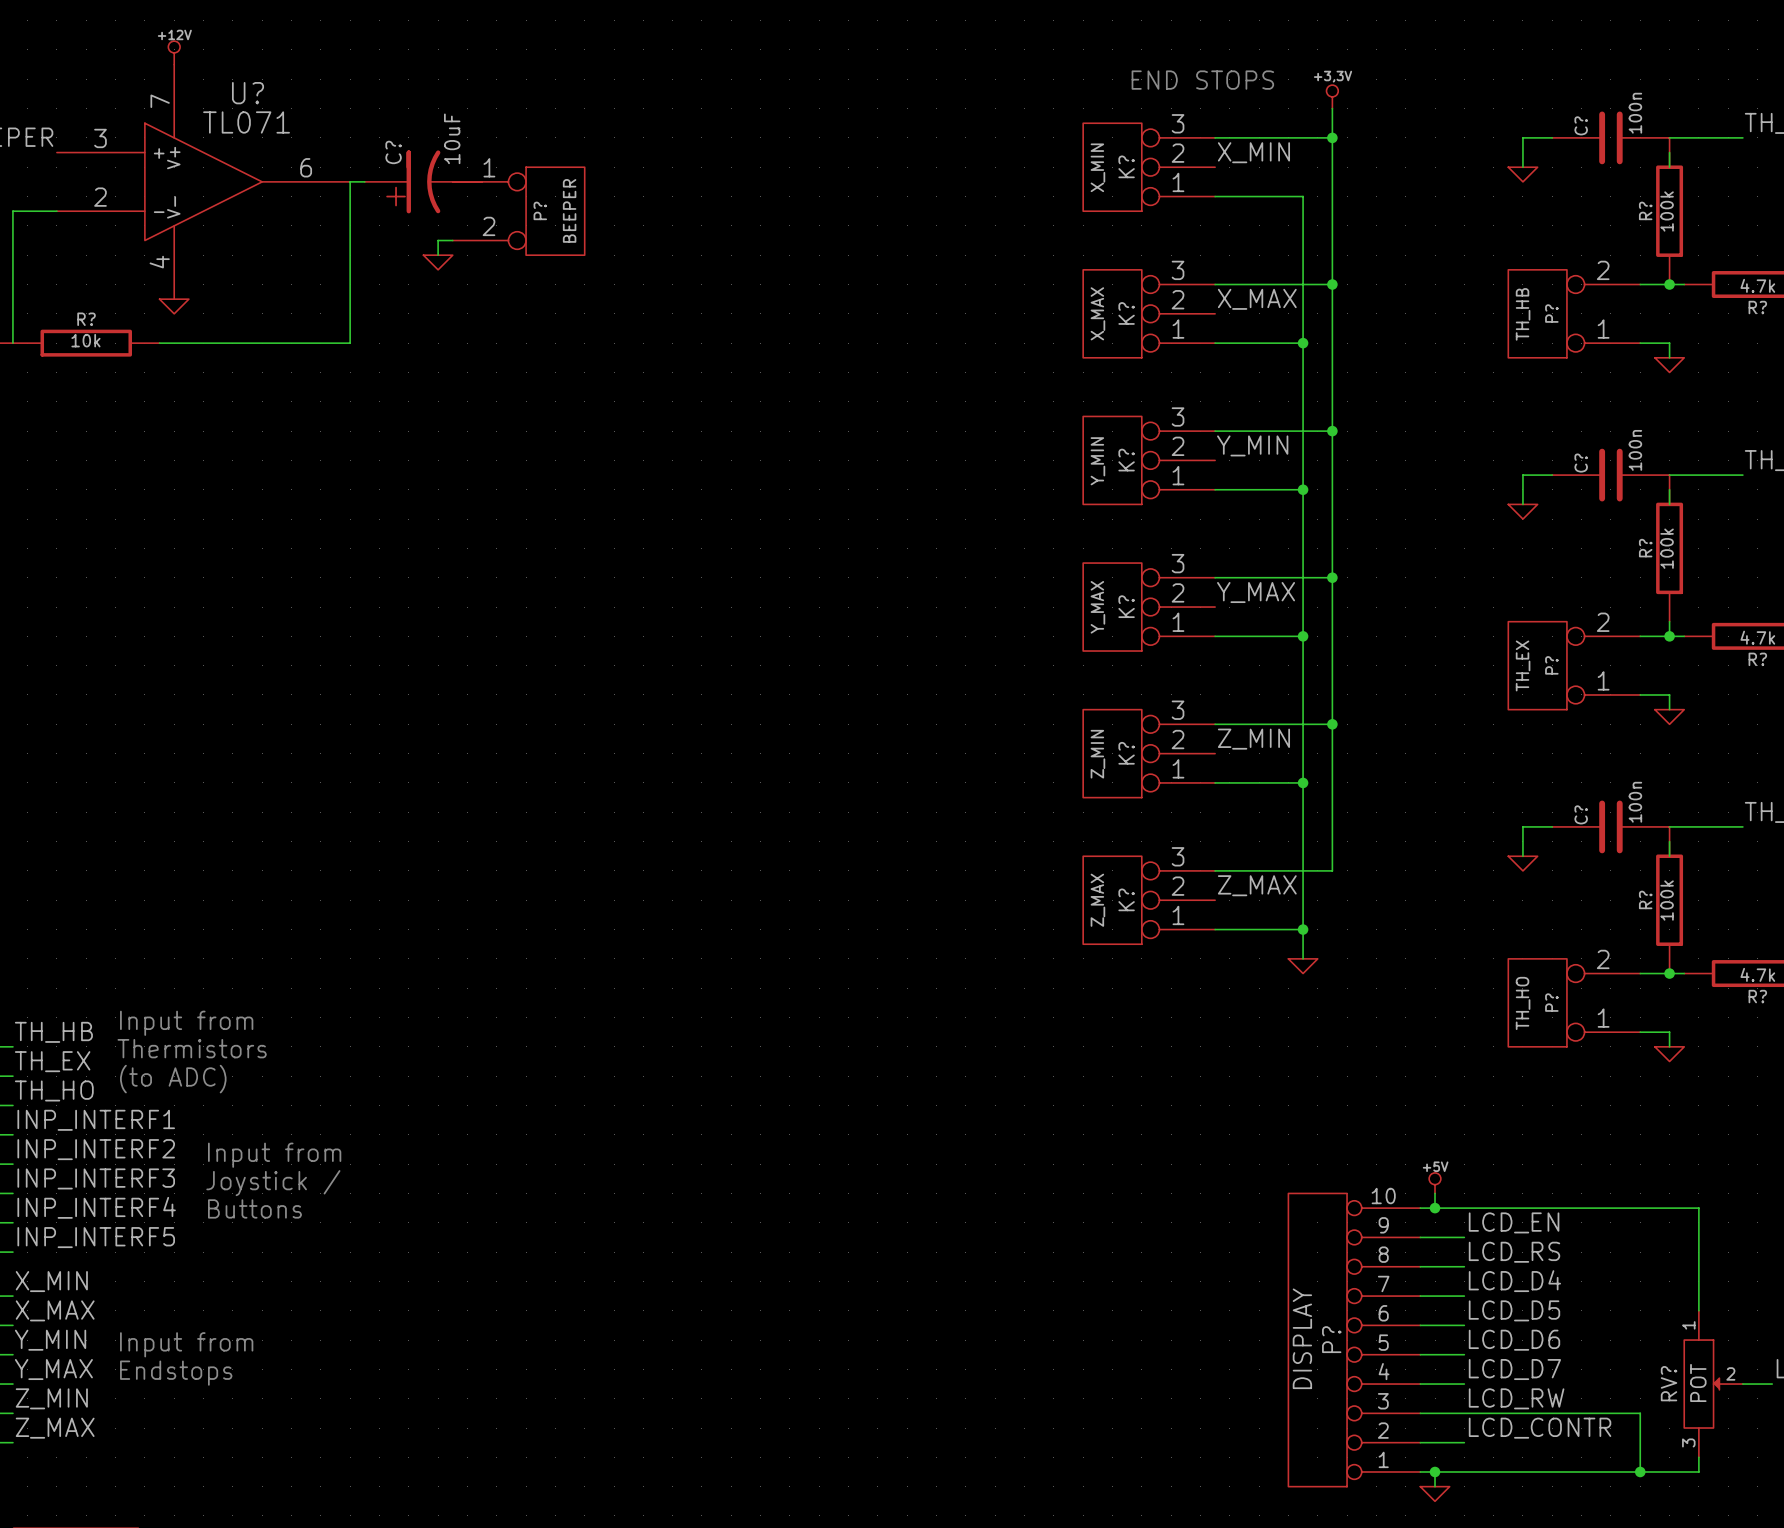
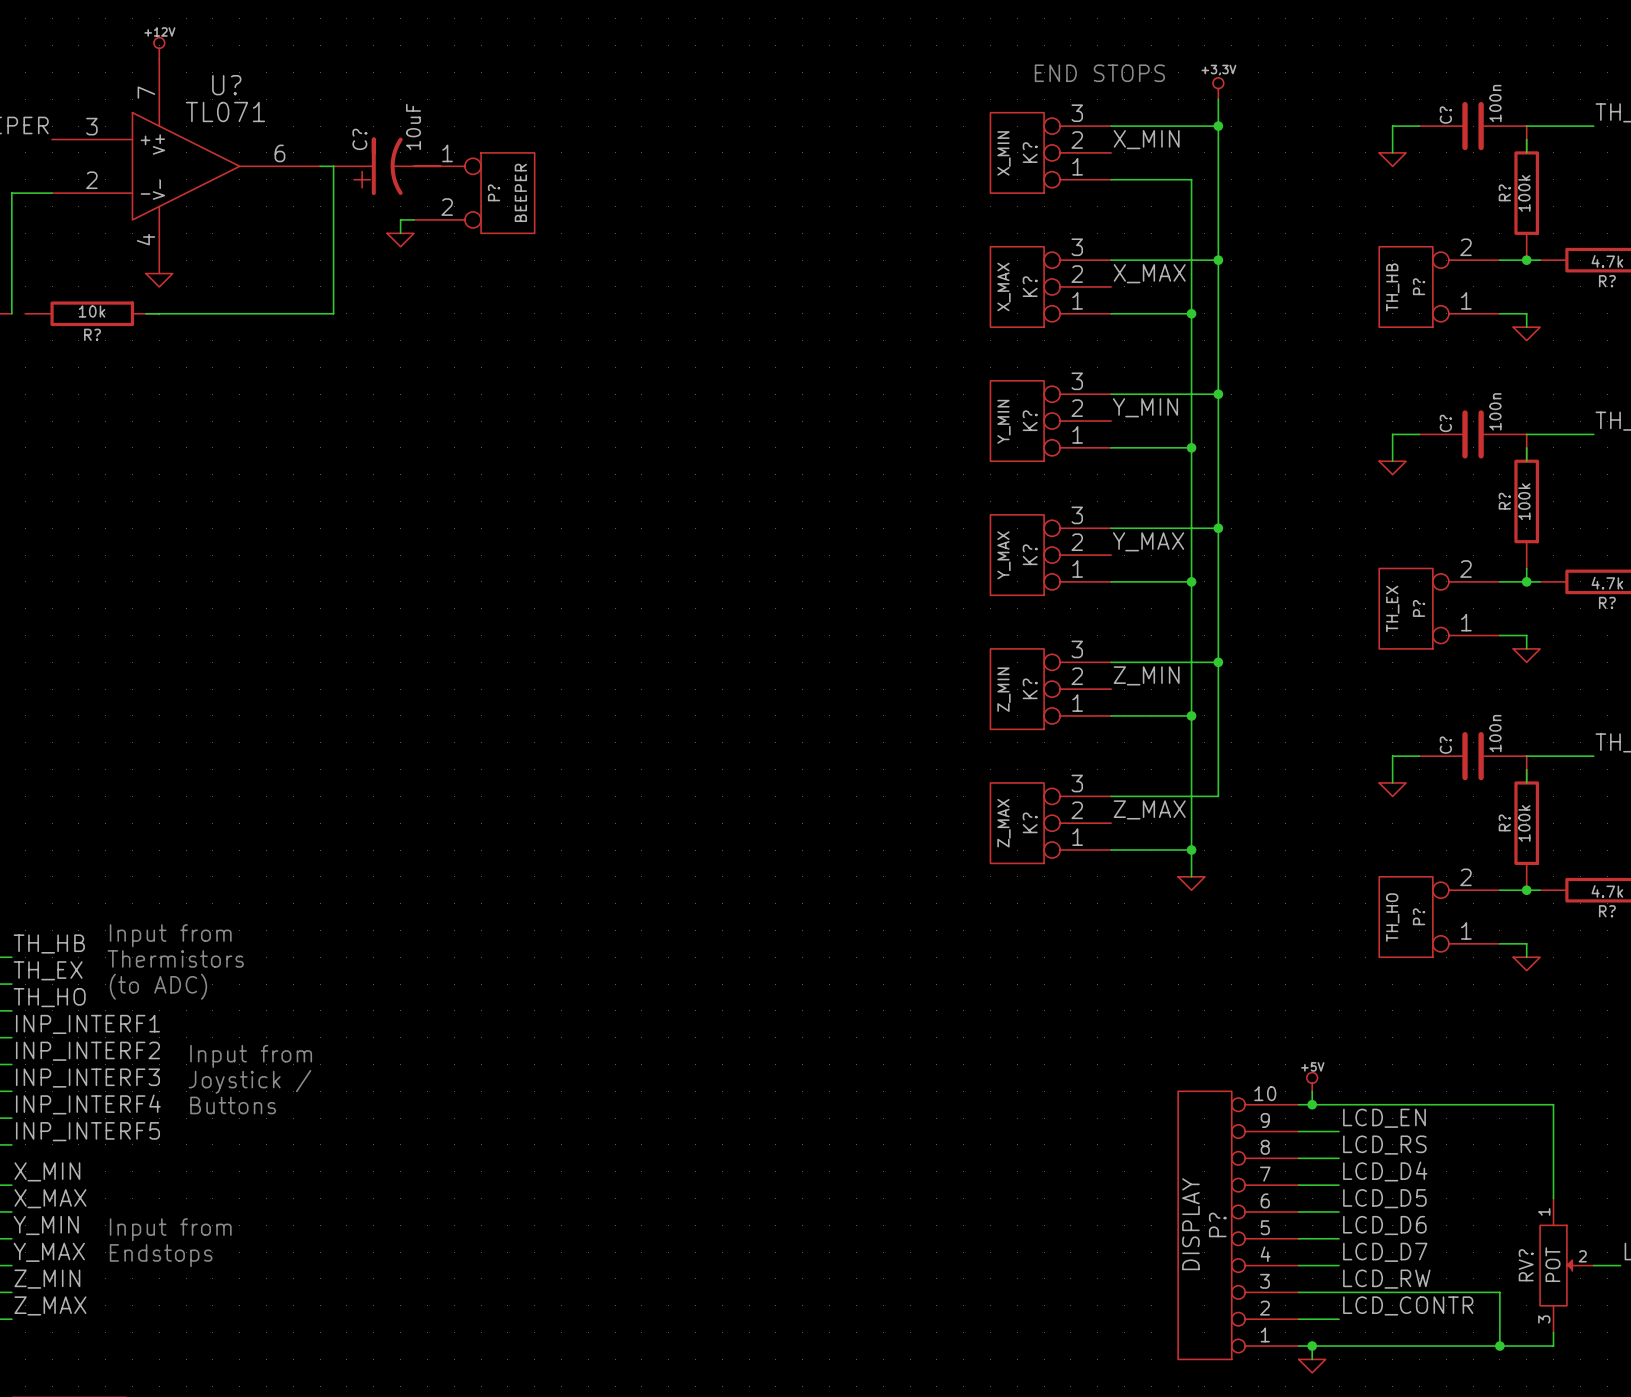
wire: (350, 181) (350, 343) -> (333, 166) (333, 313) (320, 313)
R? name position: R? (86, 319) -> R? (92, 334)
R? position: (86, 343) -> (92, 313)

